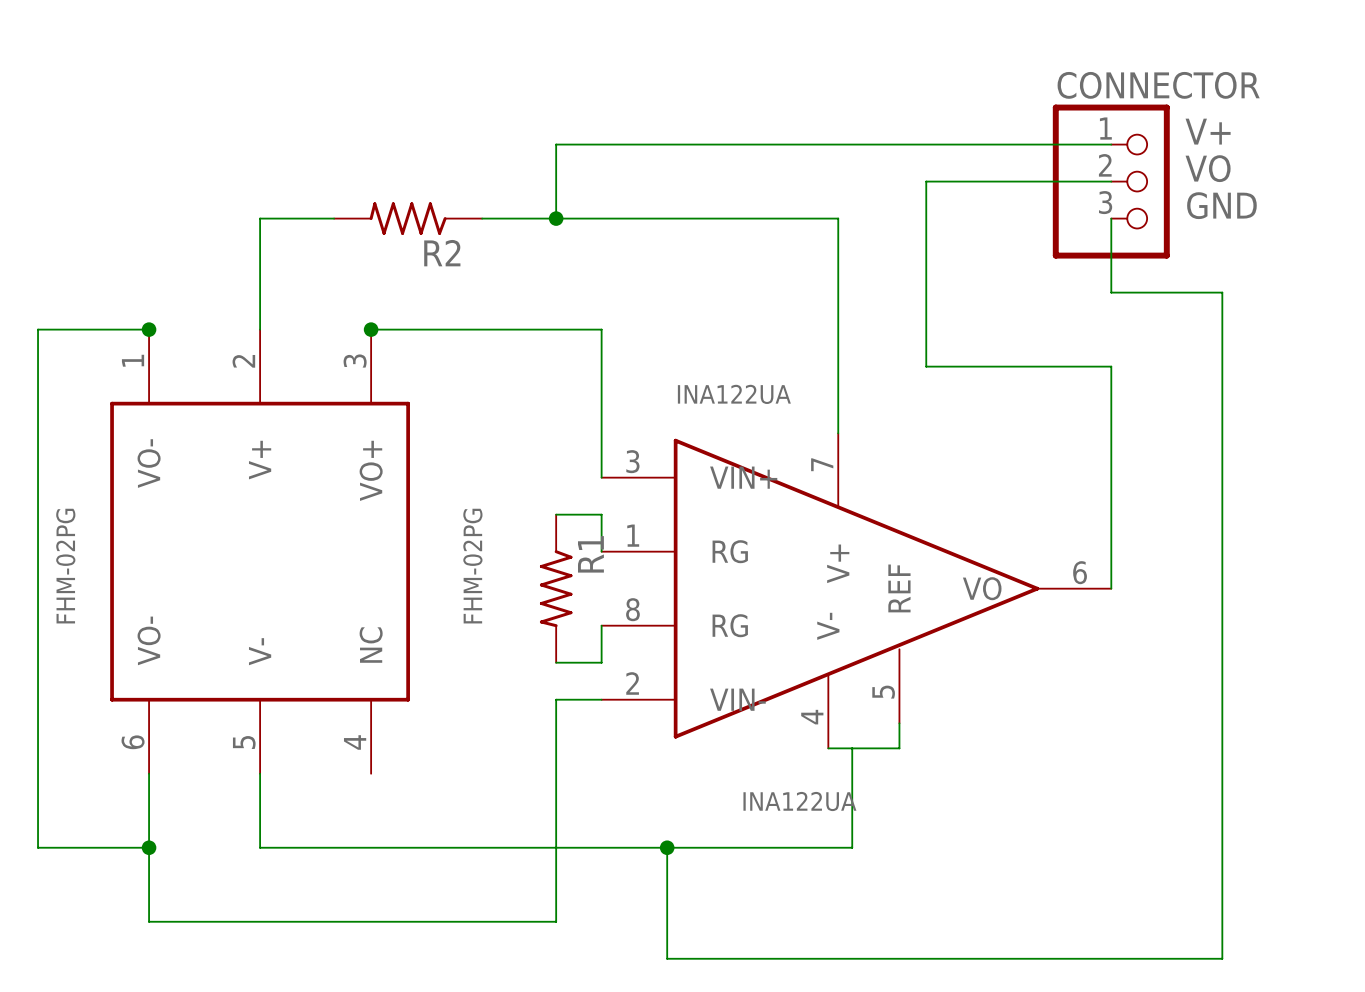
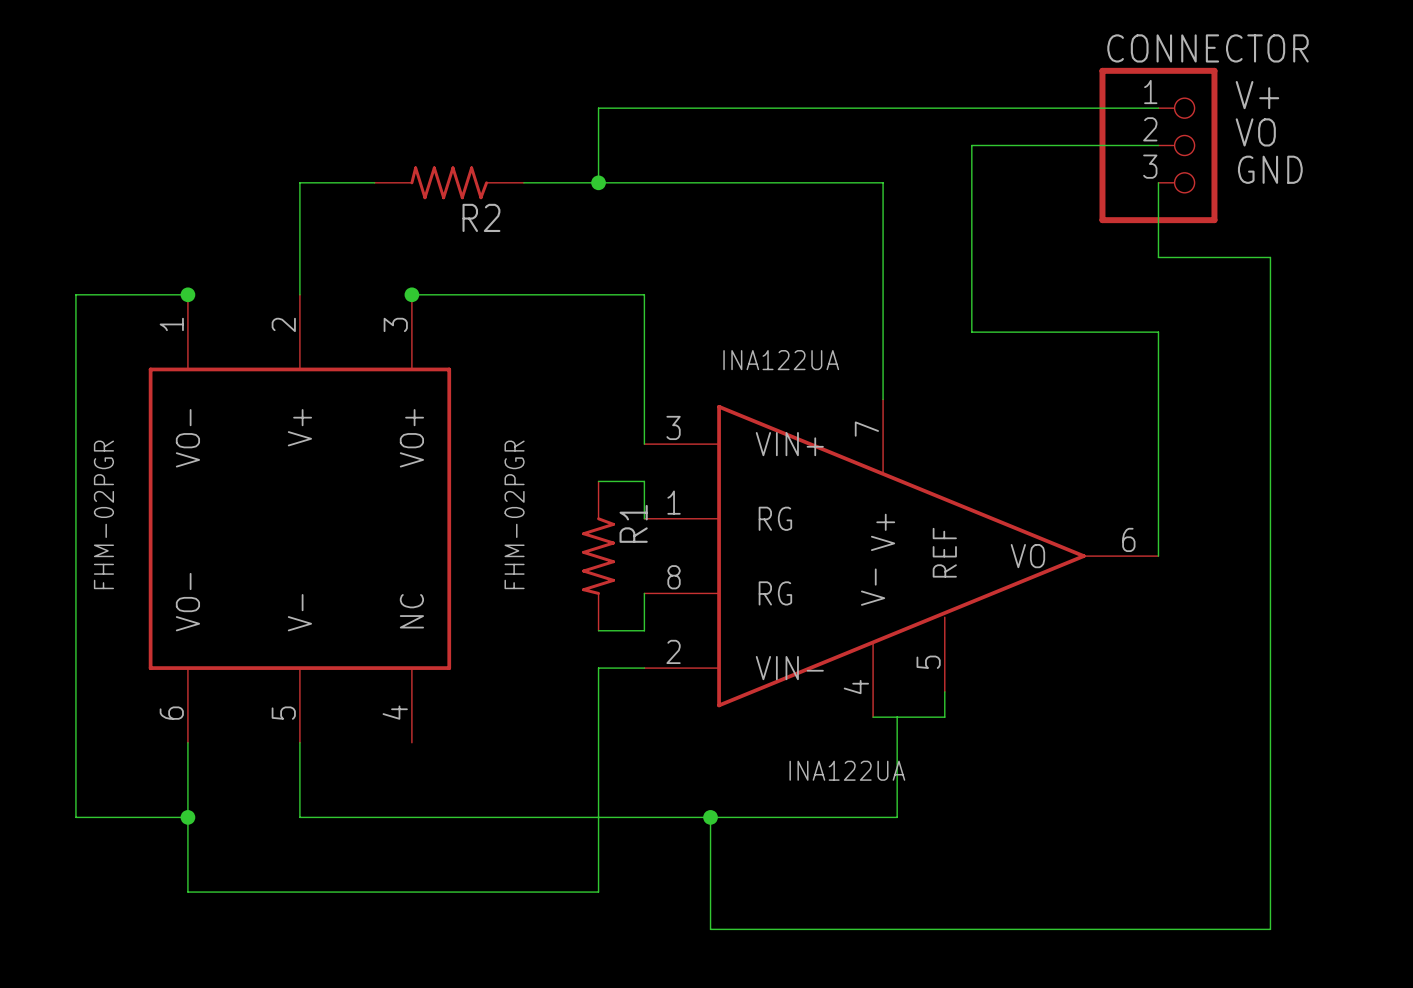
FHM-02PG name: FHM-02PG (65, 566) -> FHM-02PGR (103, 514)
FHM-02PG value: FHM-02PG (472, 566) -> FHM-02PGR (514, 514)

